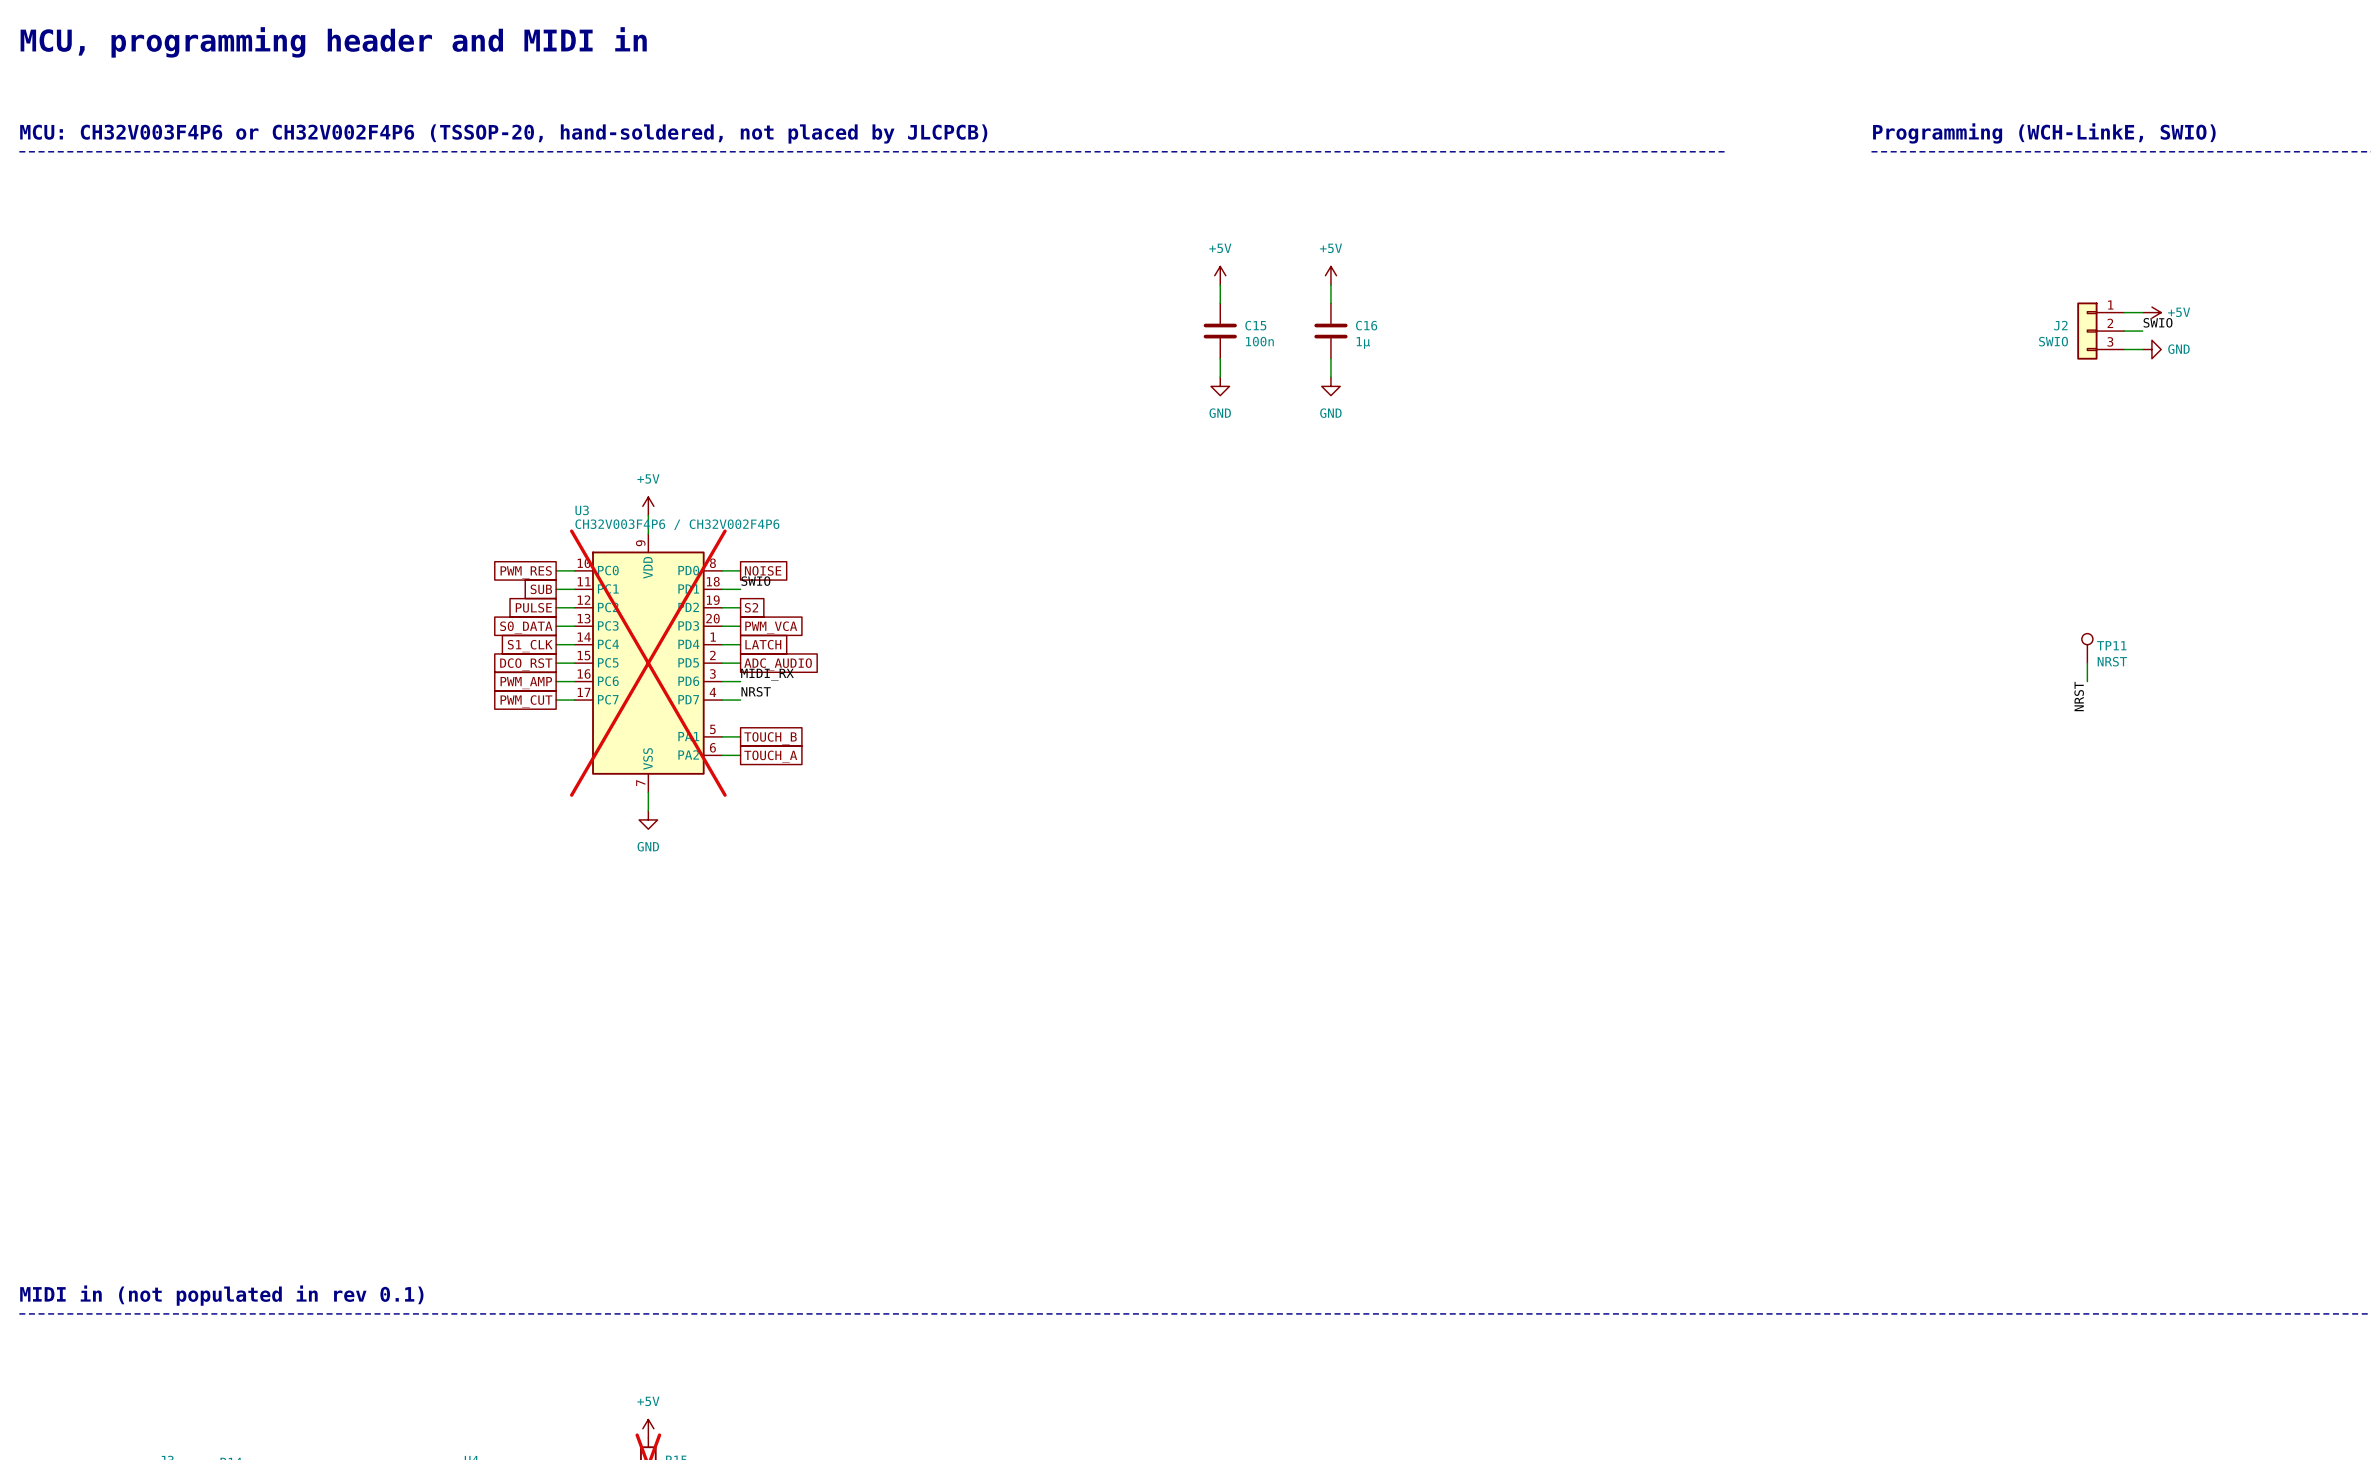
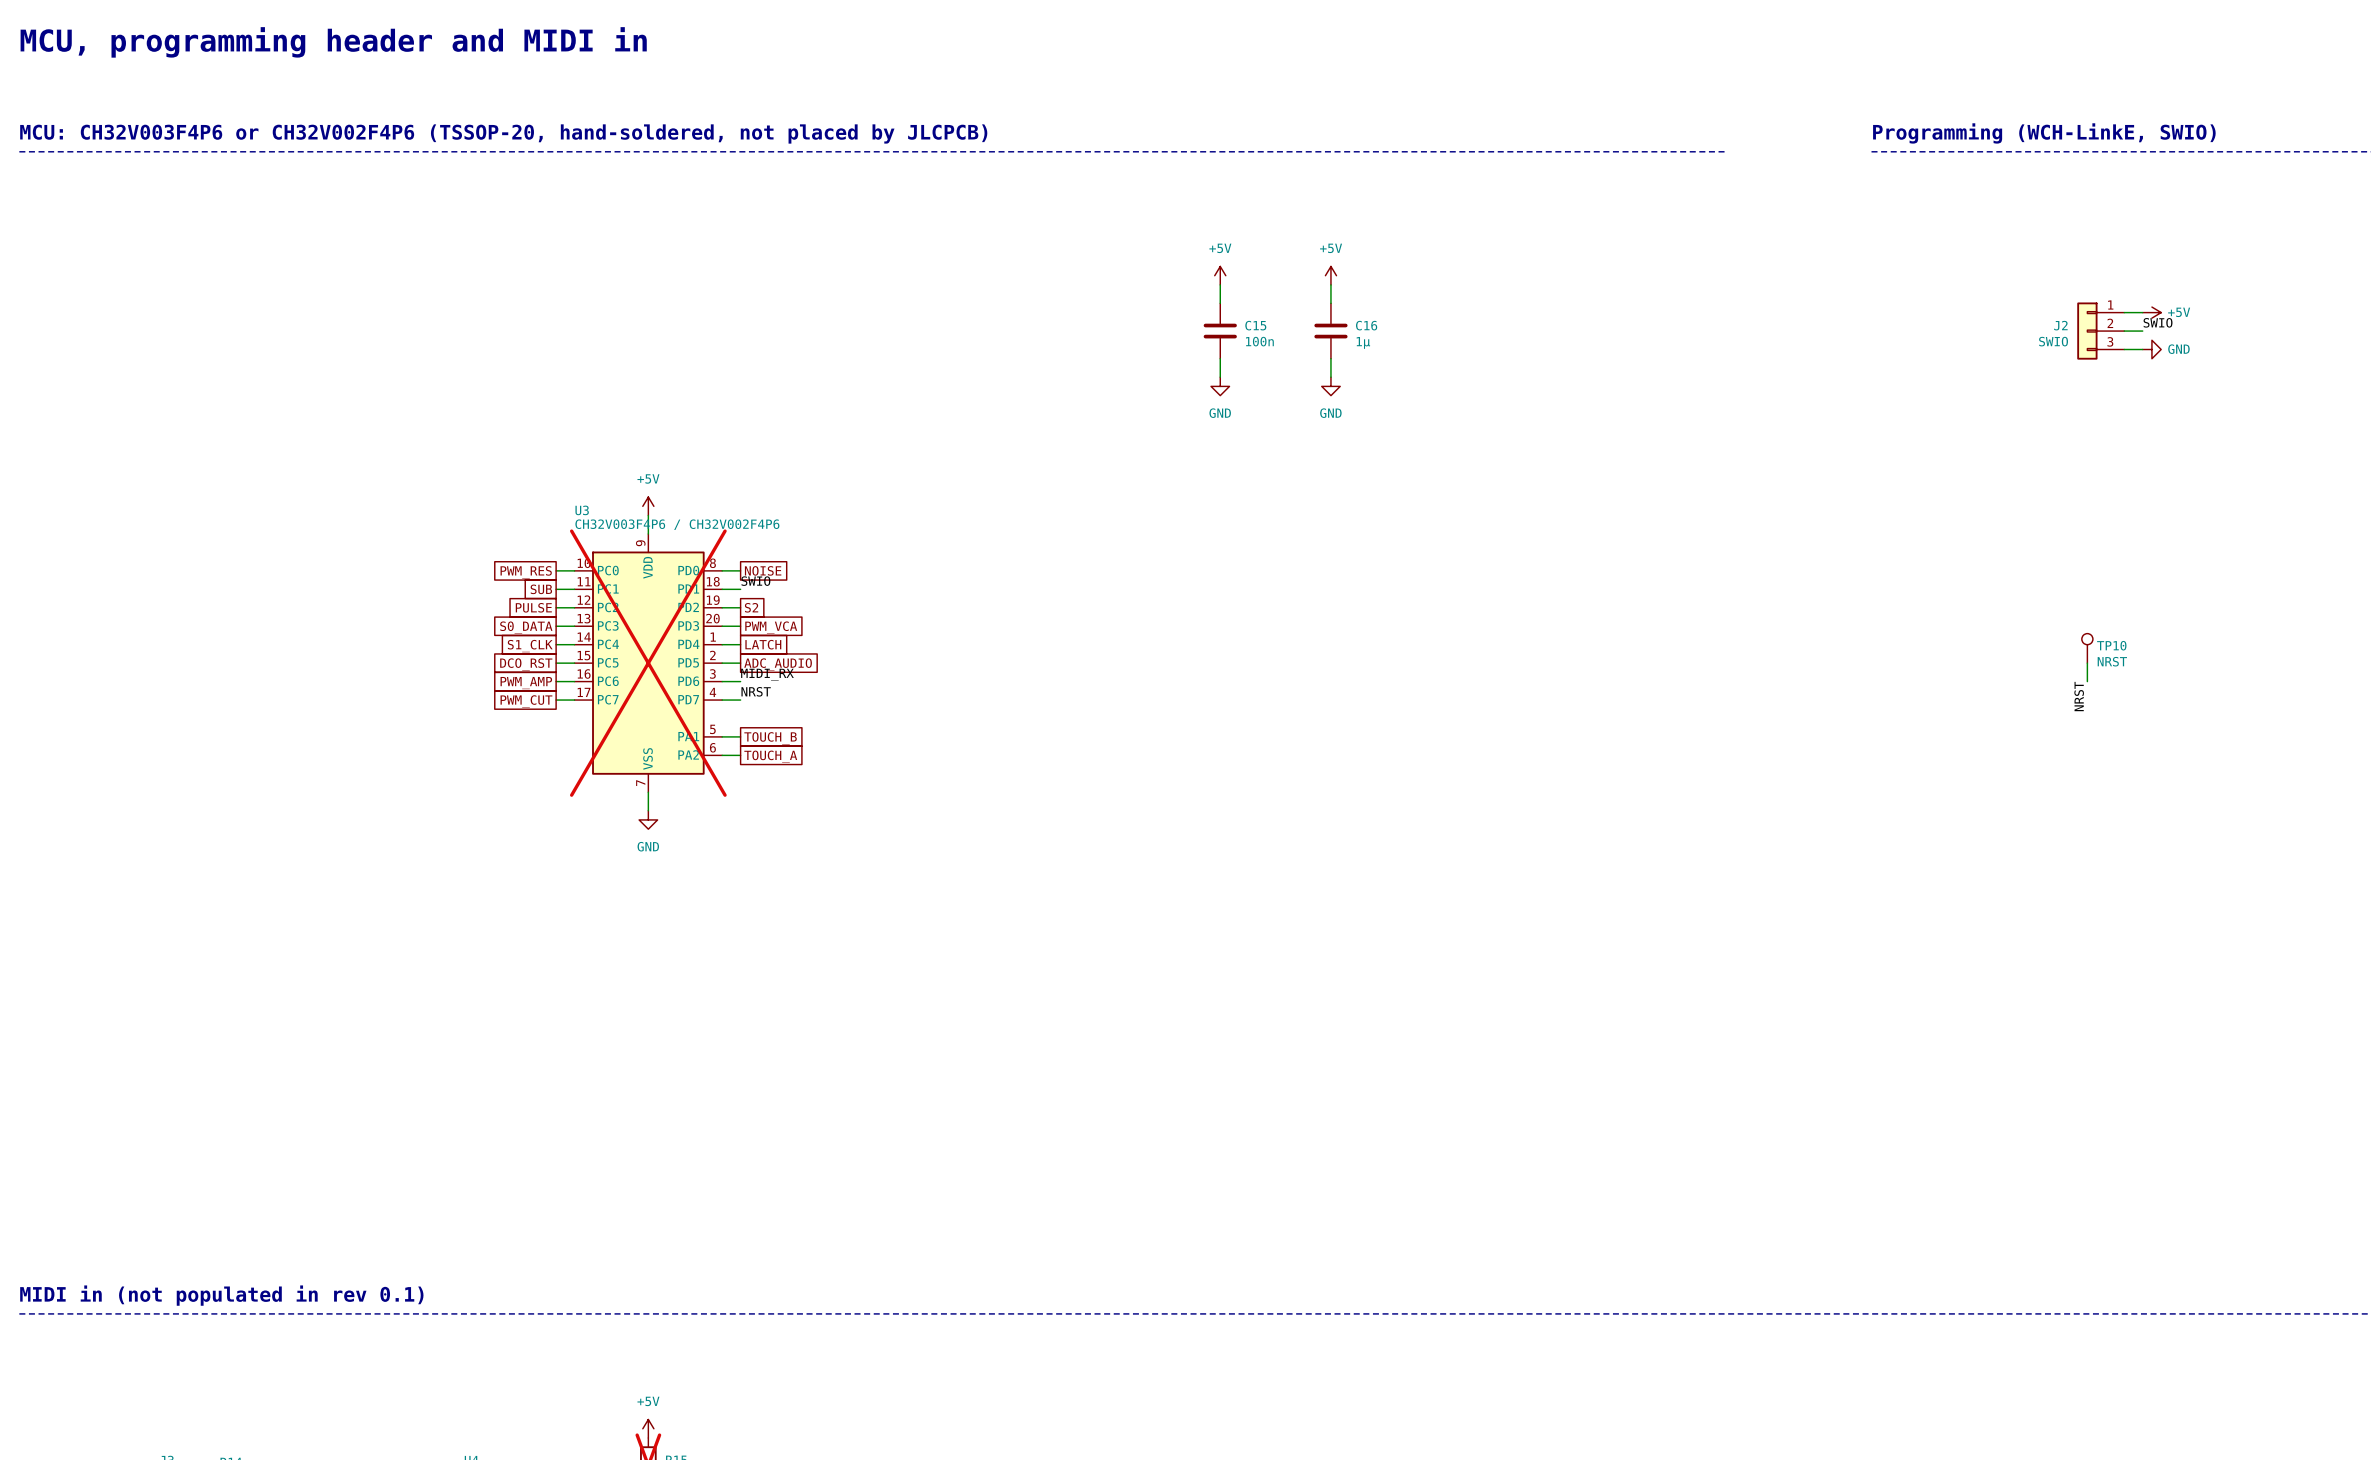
TP11 name: TP11 (2111, 645) -> TP10 (2111, 645)

